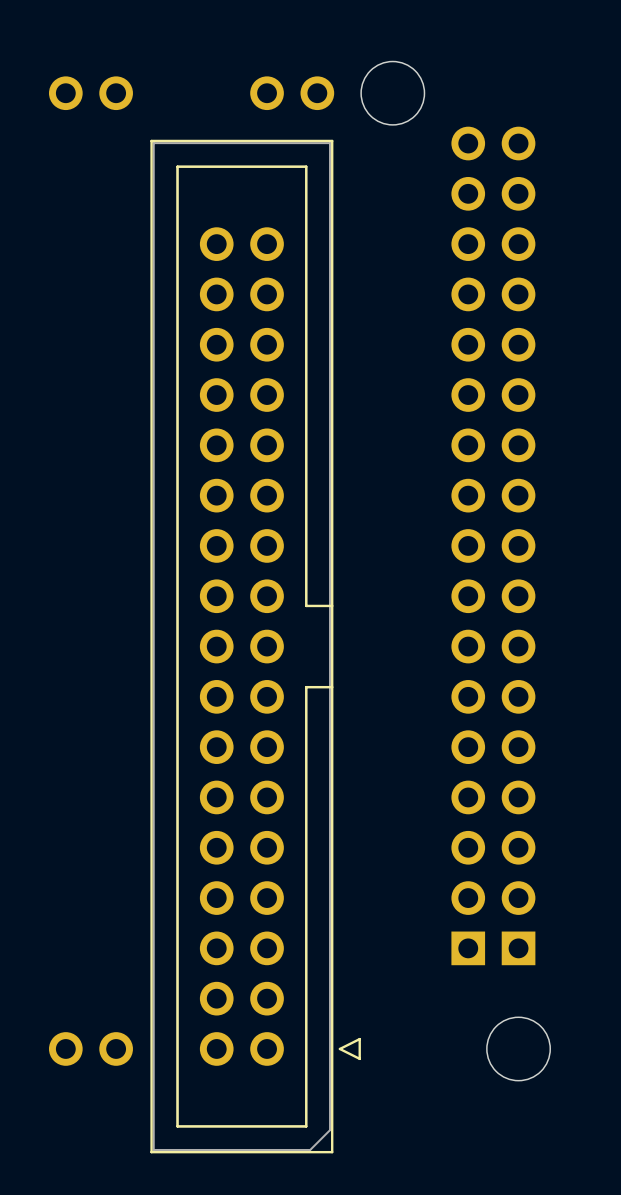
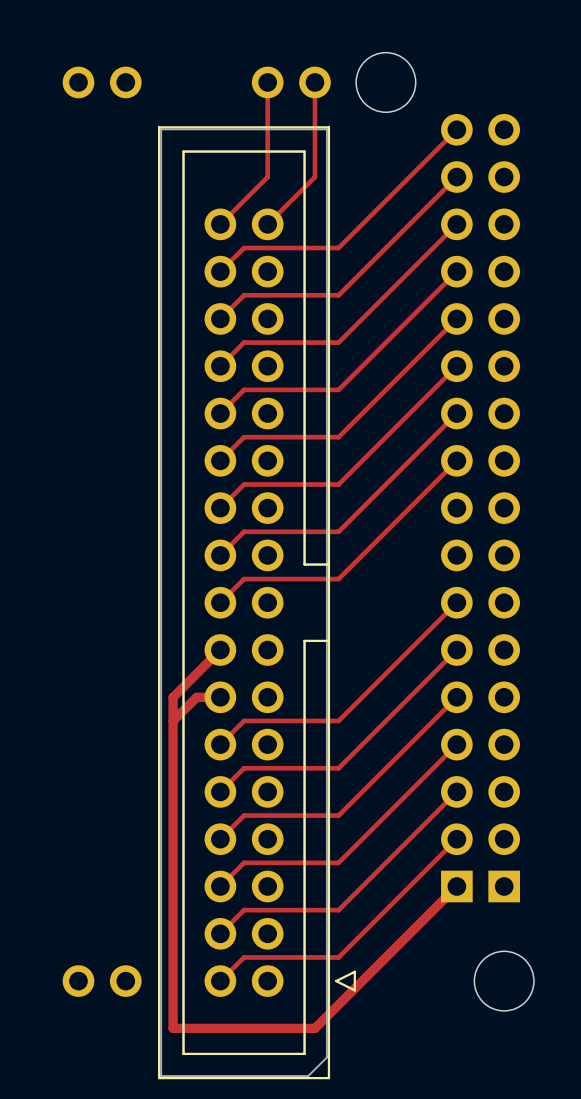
track: none -> (267, 82) (267, 177) (220, 224)
track: none -> (314, 82) (314, 177) (267, 224)
track: none -> (456, 129) (338, 247) (244, 247) (220, 271)
track: none -> (456, 177) (338, 295) (244, 295) (220, 318)
track: none -> (456, 224) (338, 342) (244, 342) (220, 366)
track: none -> (456, 271) (338, 389) (244, 389) (220, 413)
track: none -> (456, 318) (338, 437) (244, 437) (220, 460)
track: none -> (456, 366) (338, 484) (244, 484) (220, 508)
track: none -> (456, 413) (338, 531) (244, 531) (220, 555)
track: none -> (456, 460) (338, 579) (244, 579) (220, 602)
track: none -> (456, 602) (338, 720) (244, 720) (220, 744)
track: none -> (220, 650) (173, 697) (173, 1028) (314, 1028) (456, 886)
track: none -> (456, 650) (338, 768) (244, 768) (220, 791)
track: none -> (220, 697) (196, 697) (173, 720)
track: none -> (456, 697) (338, 815) (244, 815) (220, 839)
track: none -> (456, 744) (338, 862) (244, 862) (220, 886)
track: none -> (456, 791) (338, 910) (244, 910) (220, 933)
track: none -> (456, 839) (338, 957) (244, 957) (220, 981)

